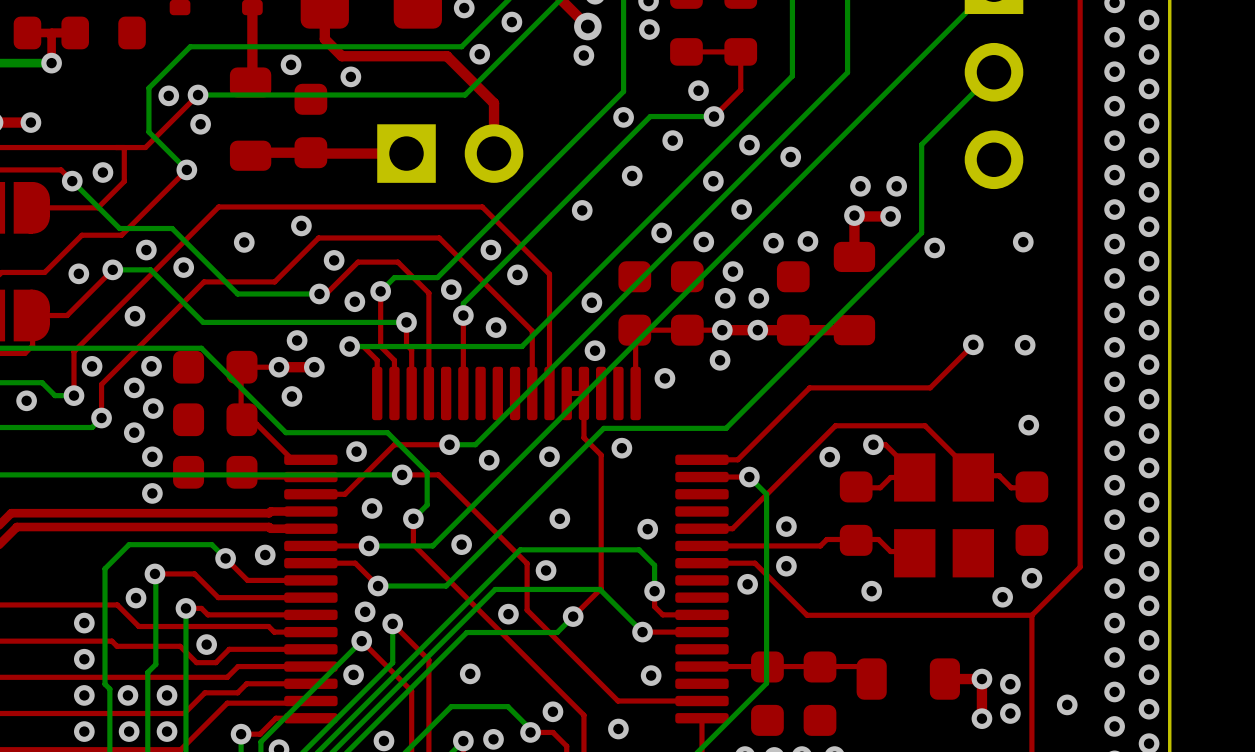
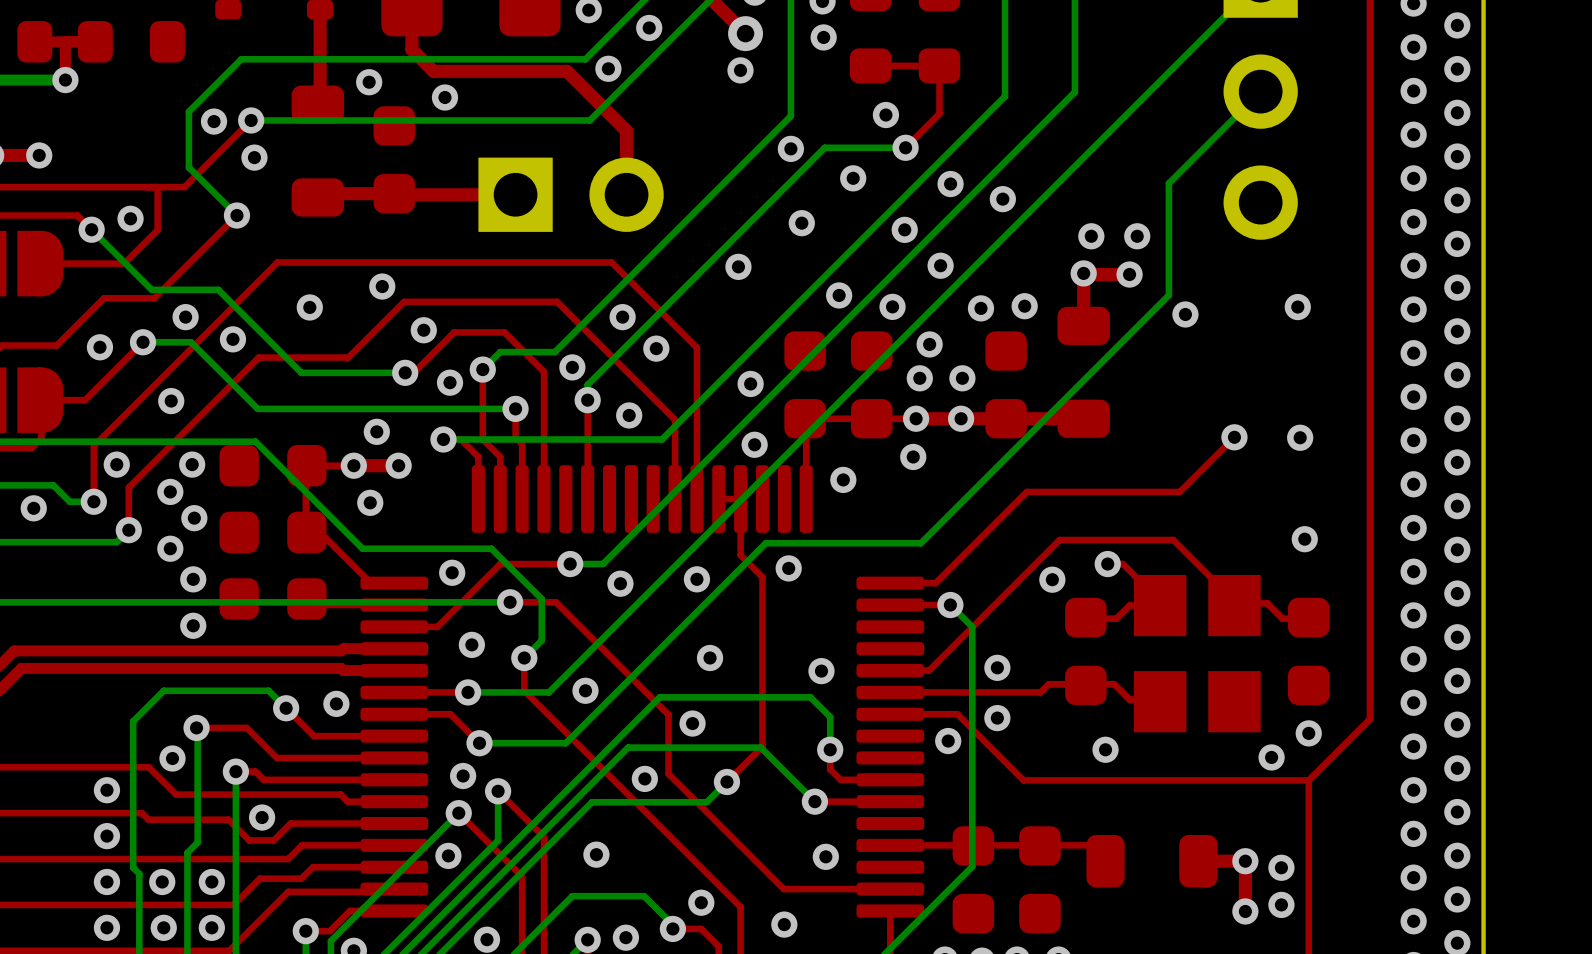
via: (1067, 704) -> none

